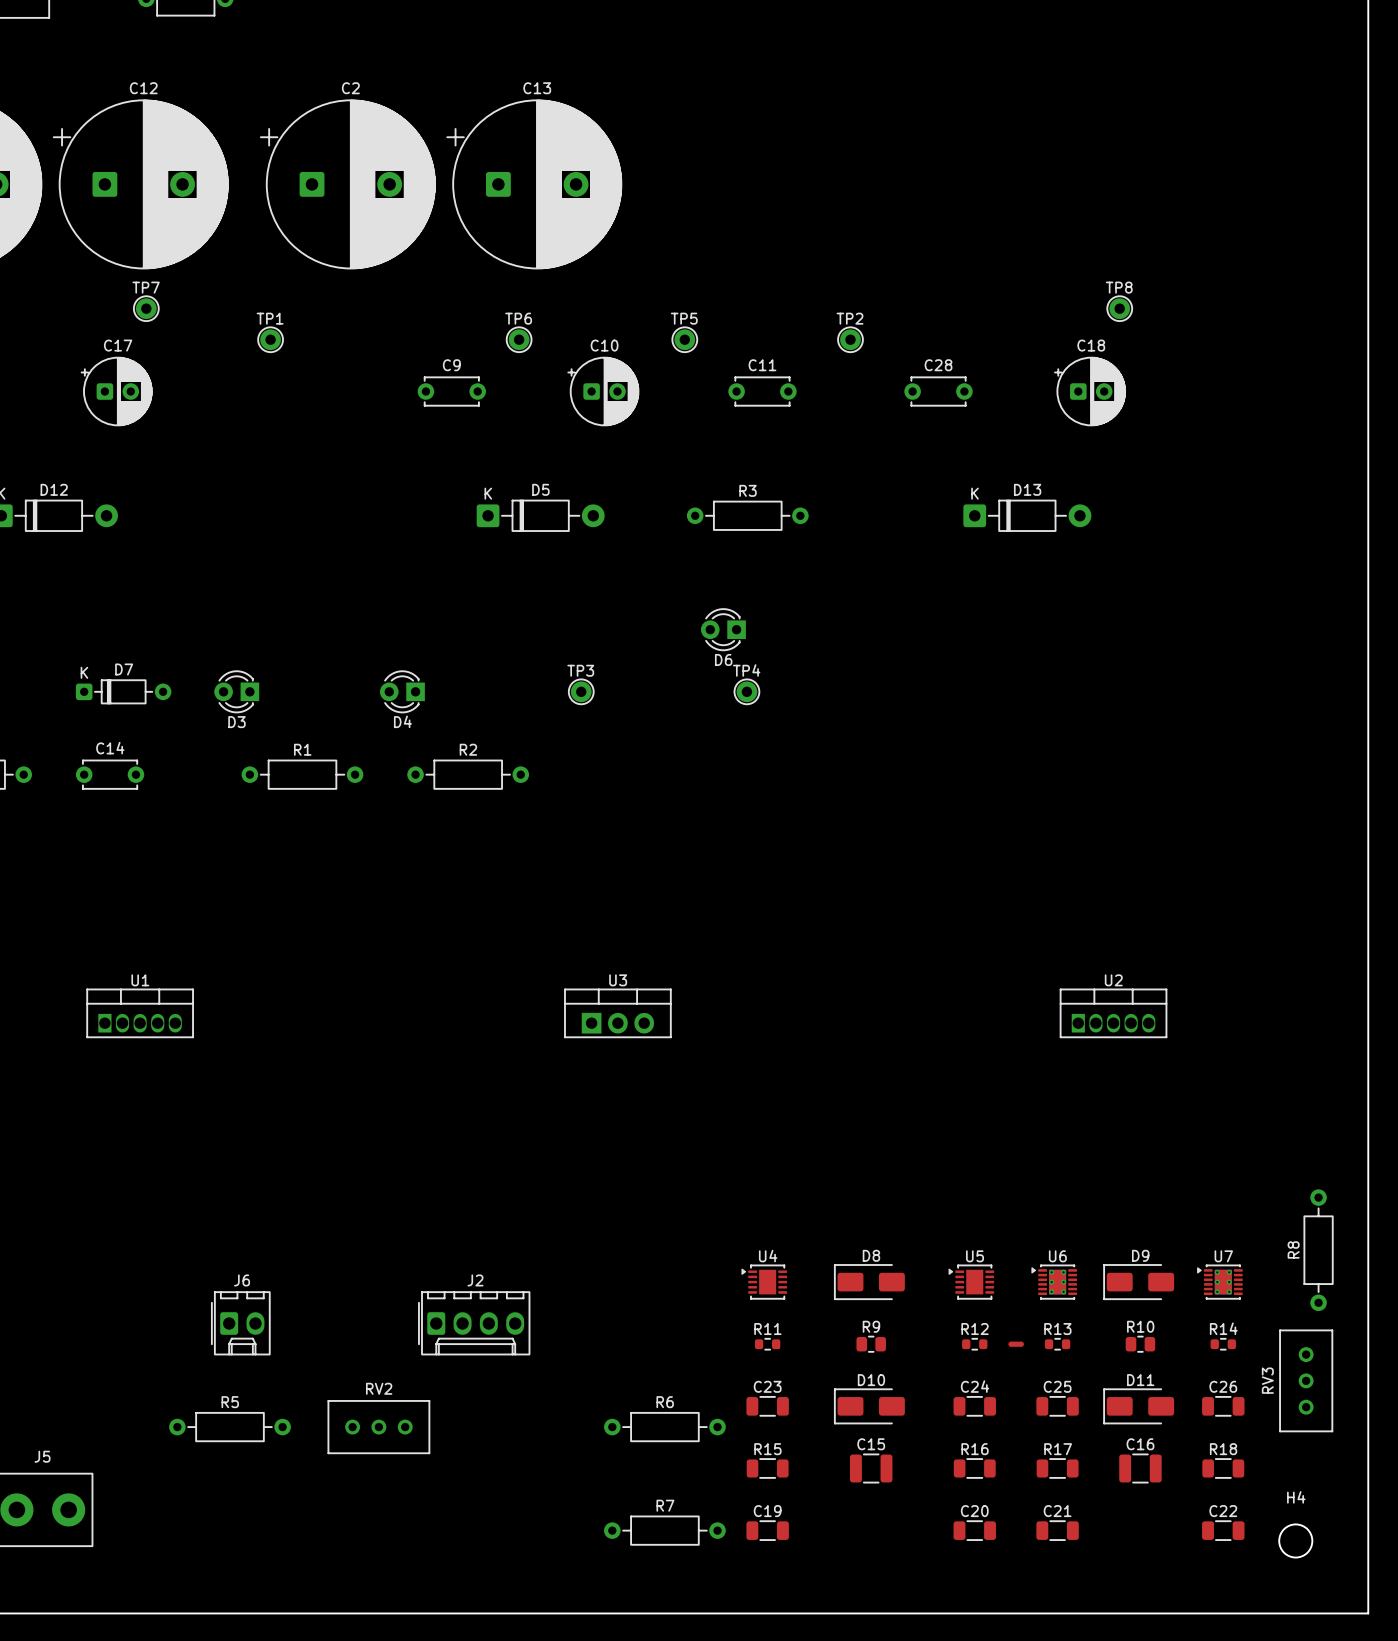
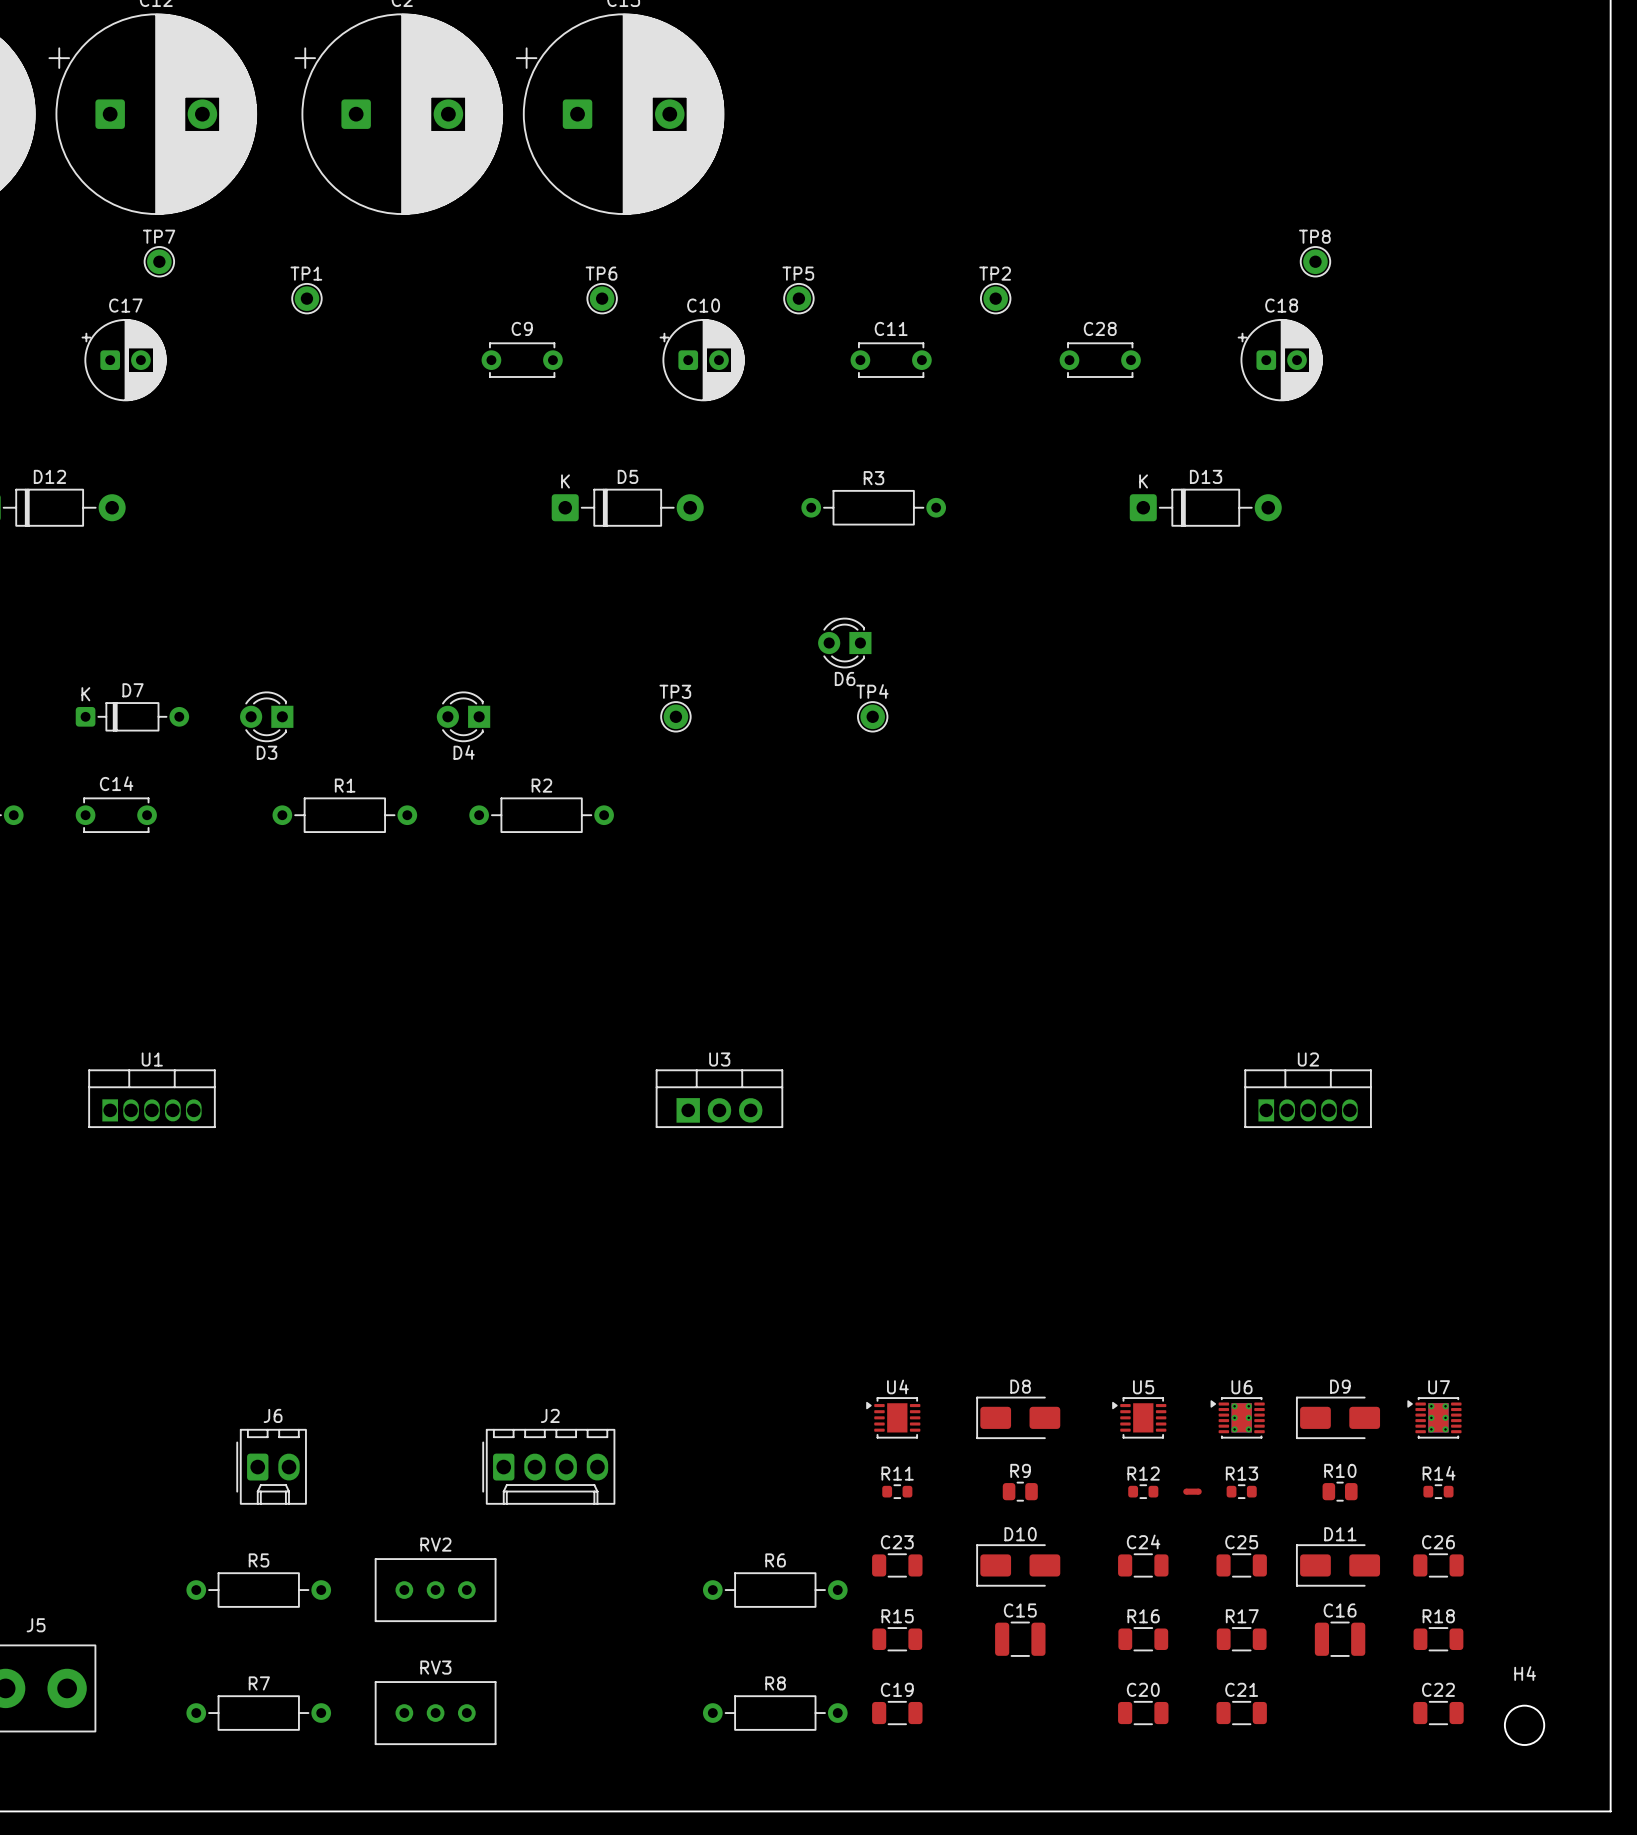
R8: (1318, 1250) -> none
RV3 rotation: 0° (1306, 1380) -> 90° clockwise (435, 1713)
RV3 position: (1306, 1380) -> (435, 1713)
R7 name: R7 (665, 1505) -> R8 (775, 1683)
R7: none -> (258, 1713)

